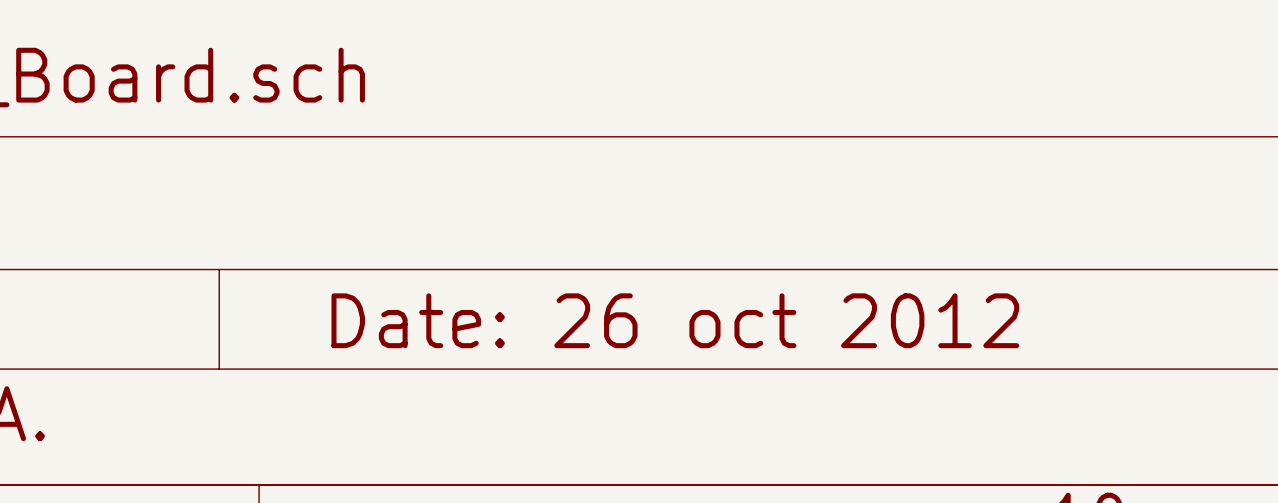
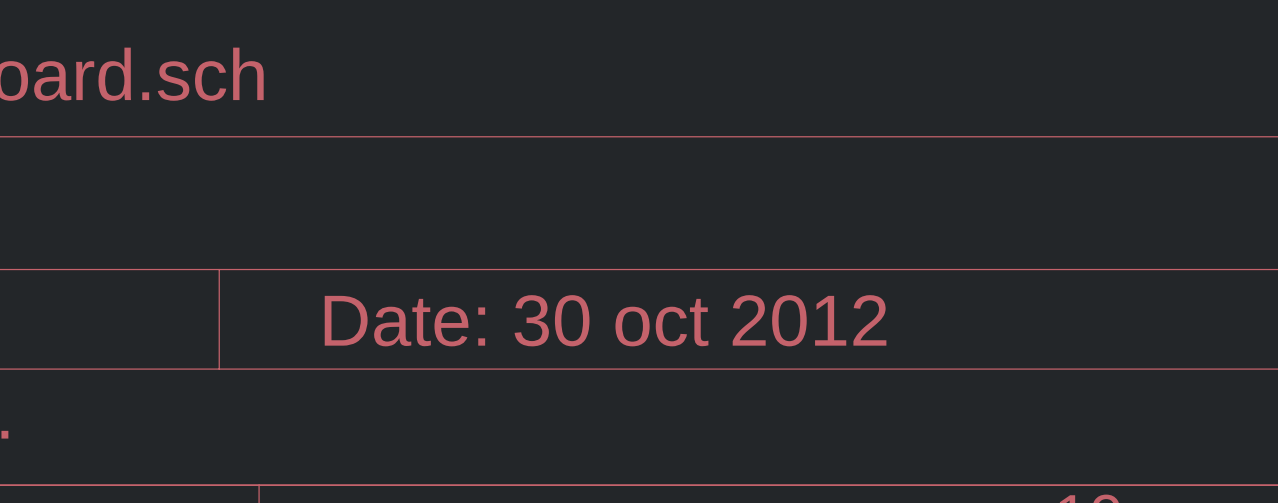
title block: Date: 26 oct 2012 (675, 320) -> Date: 30 oct 2012 (605, 320)

